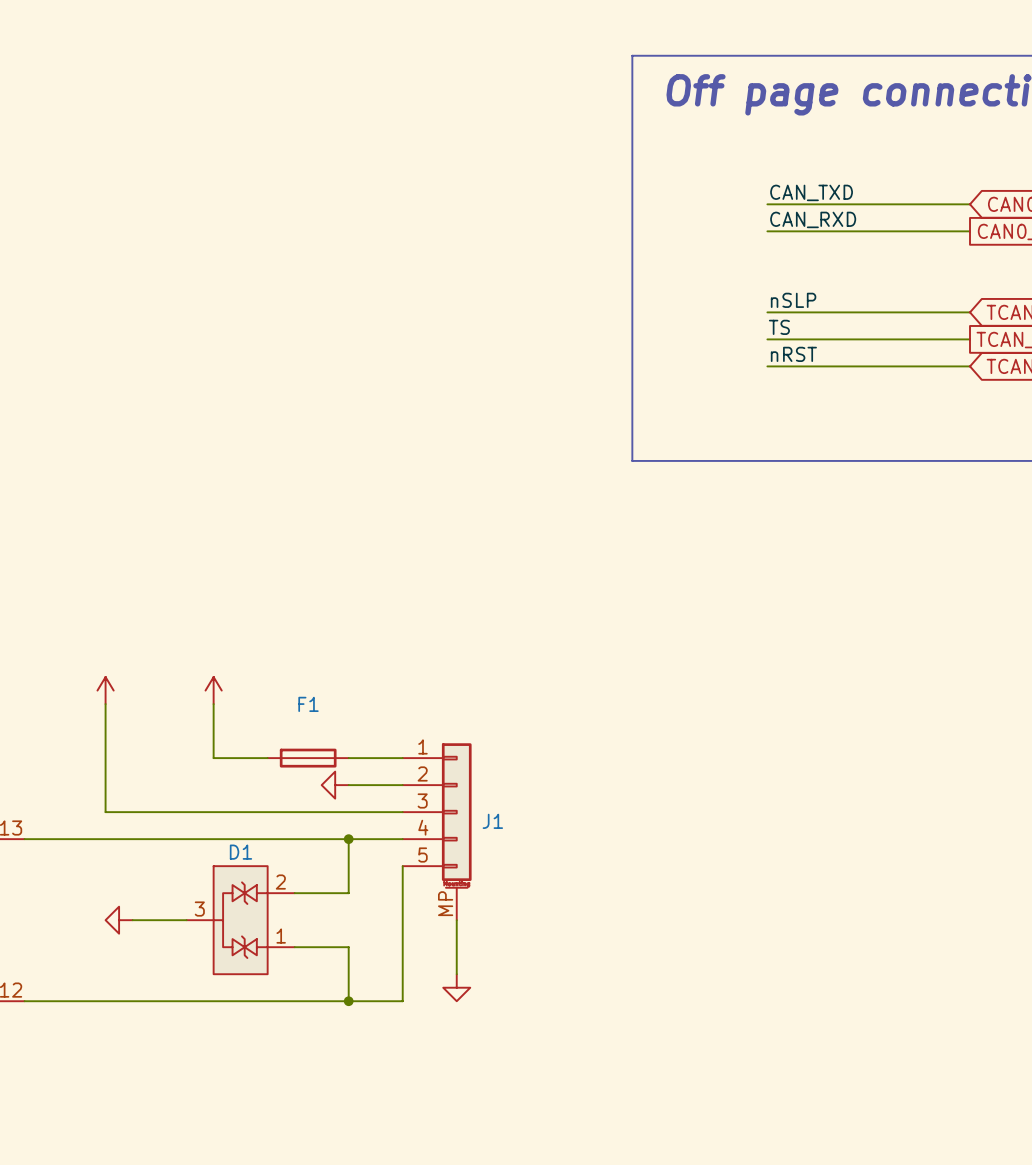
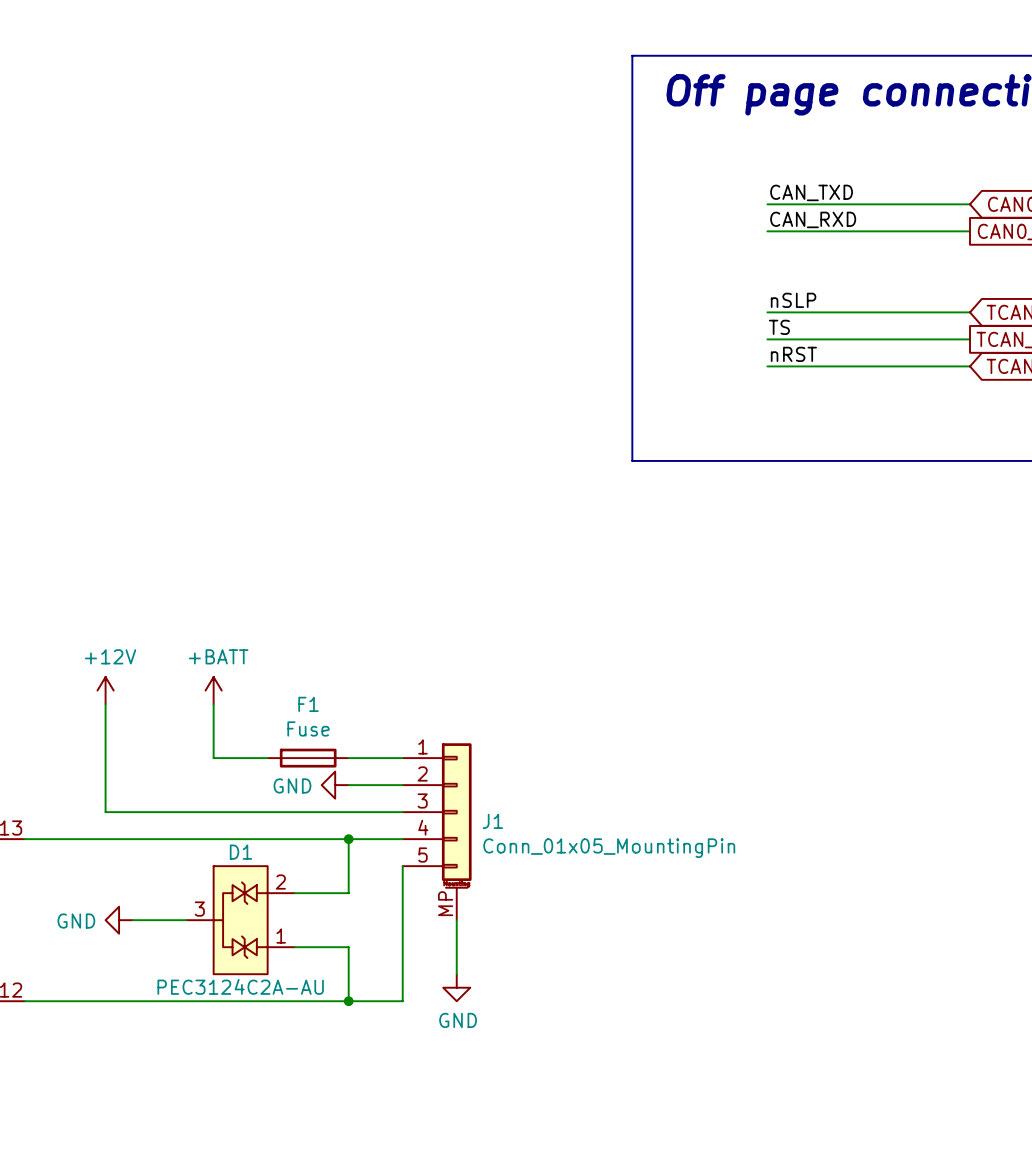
power symbol text: none -> +12V (110, 656)
power symbol text: none -> +BATT (218, 656)
F1 value: none -> Fuse (308, 728)
power symbol text: none -> GND (292, 785)
J1 value: none -> Conn_01x05_MountingPin (609, 848)
power symbol text: none -> GND (76, 921)
D1 value: none -> PEC3124C2A-AU (240, 986)
power symbol text: none -> GND (458, 1020)

